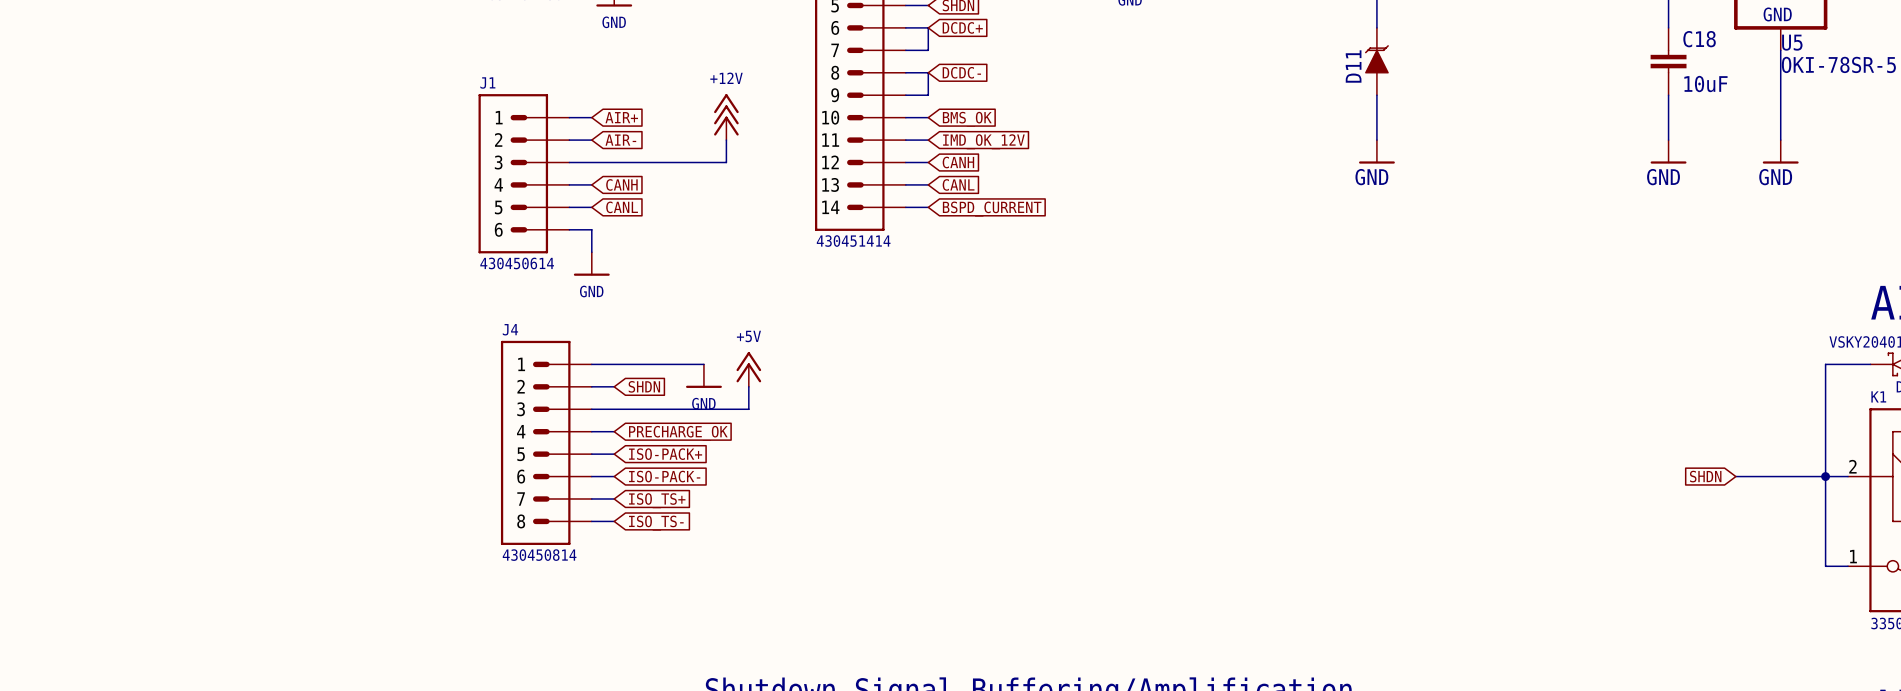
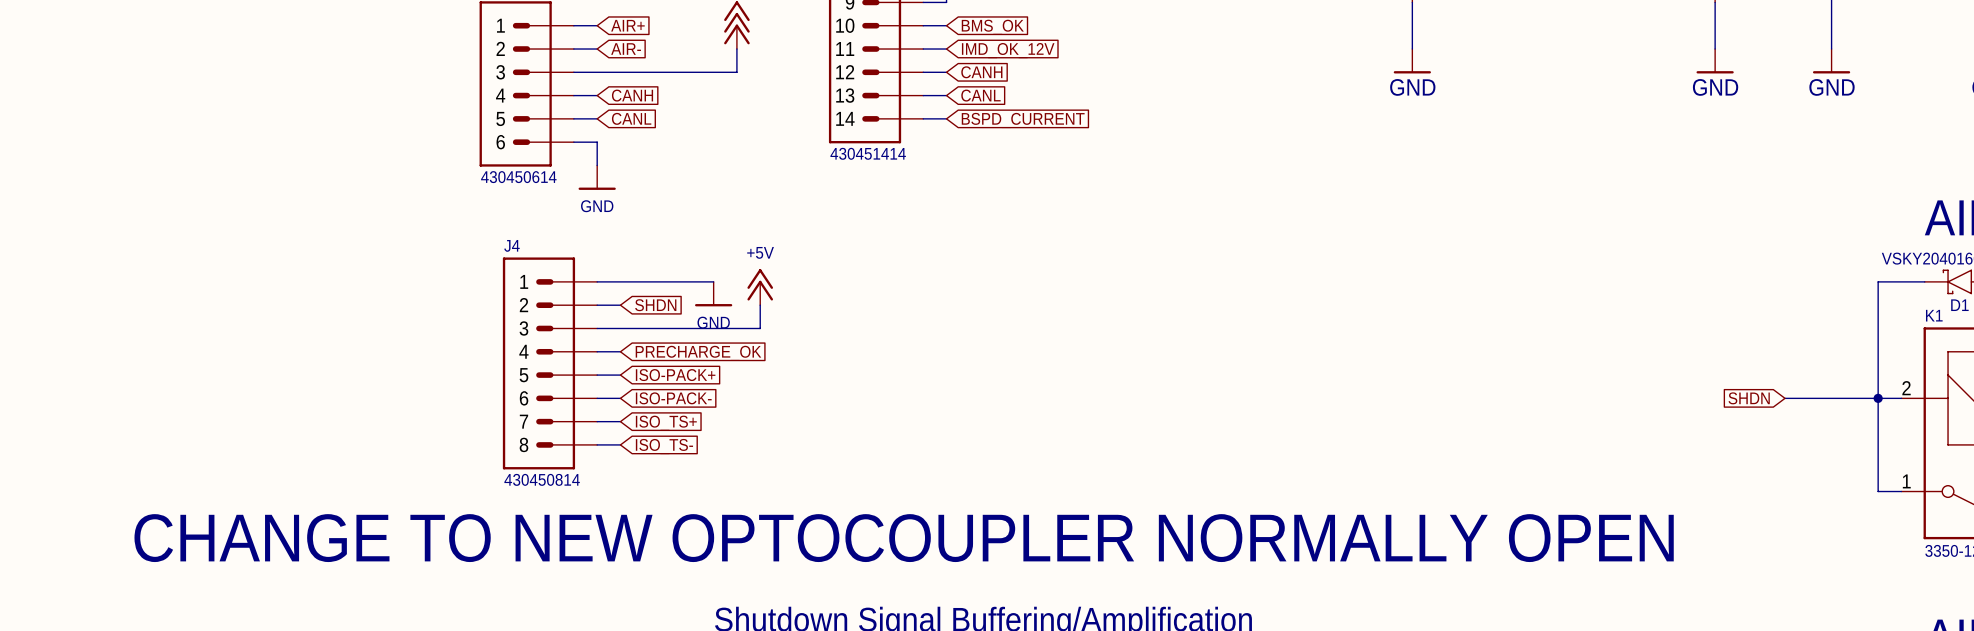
text: none -> CHANGE TO NEW OPTOCOUPLER NORMALLY OPEN (904, 538)

